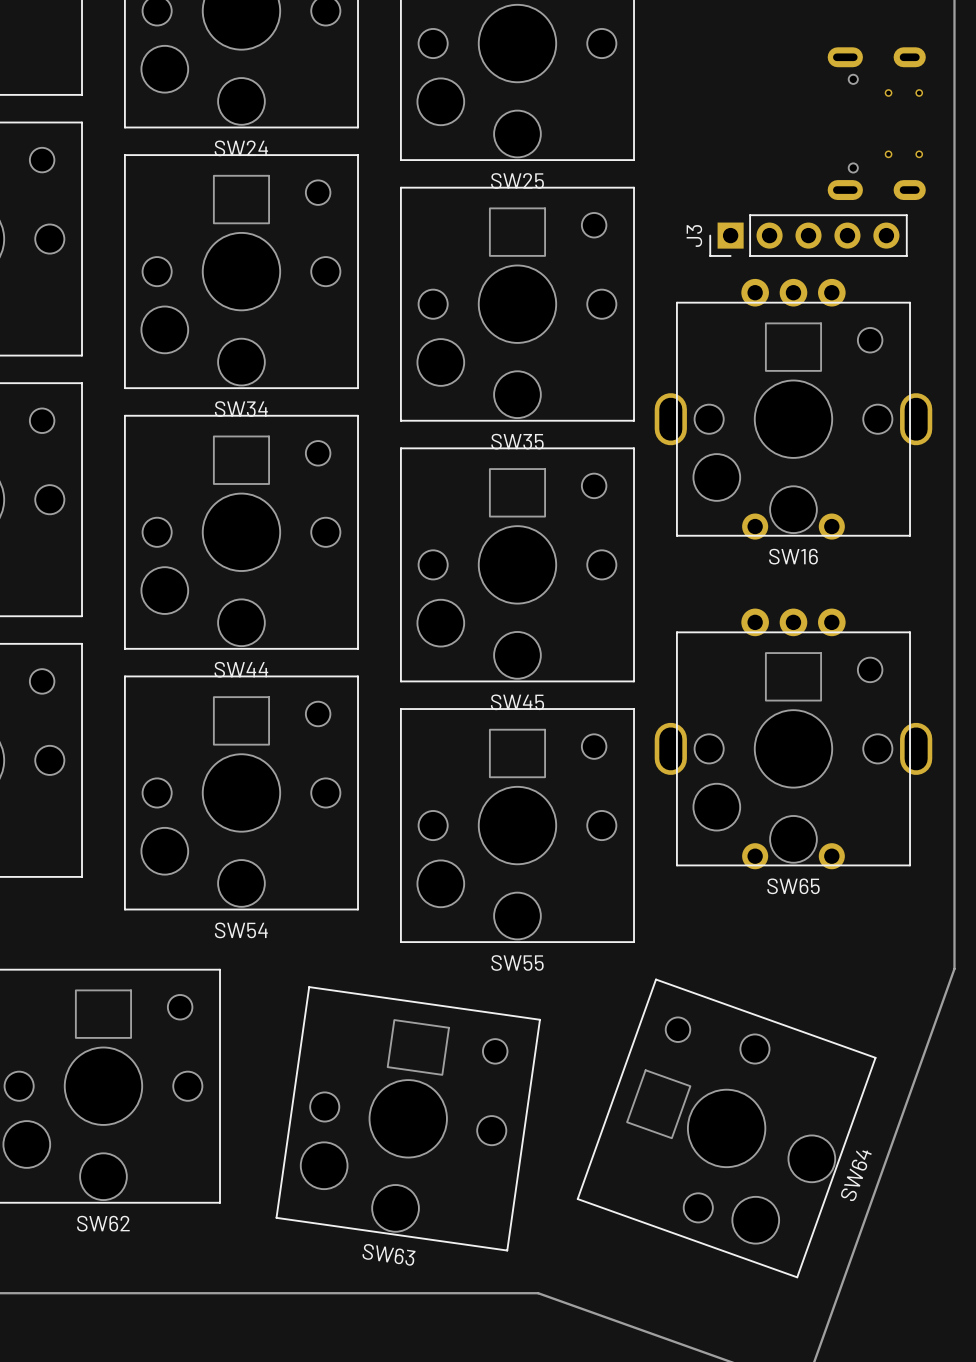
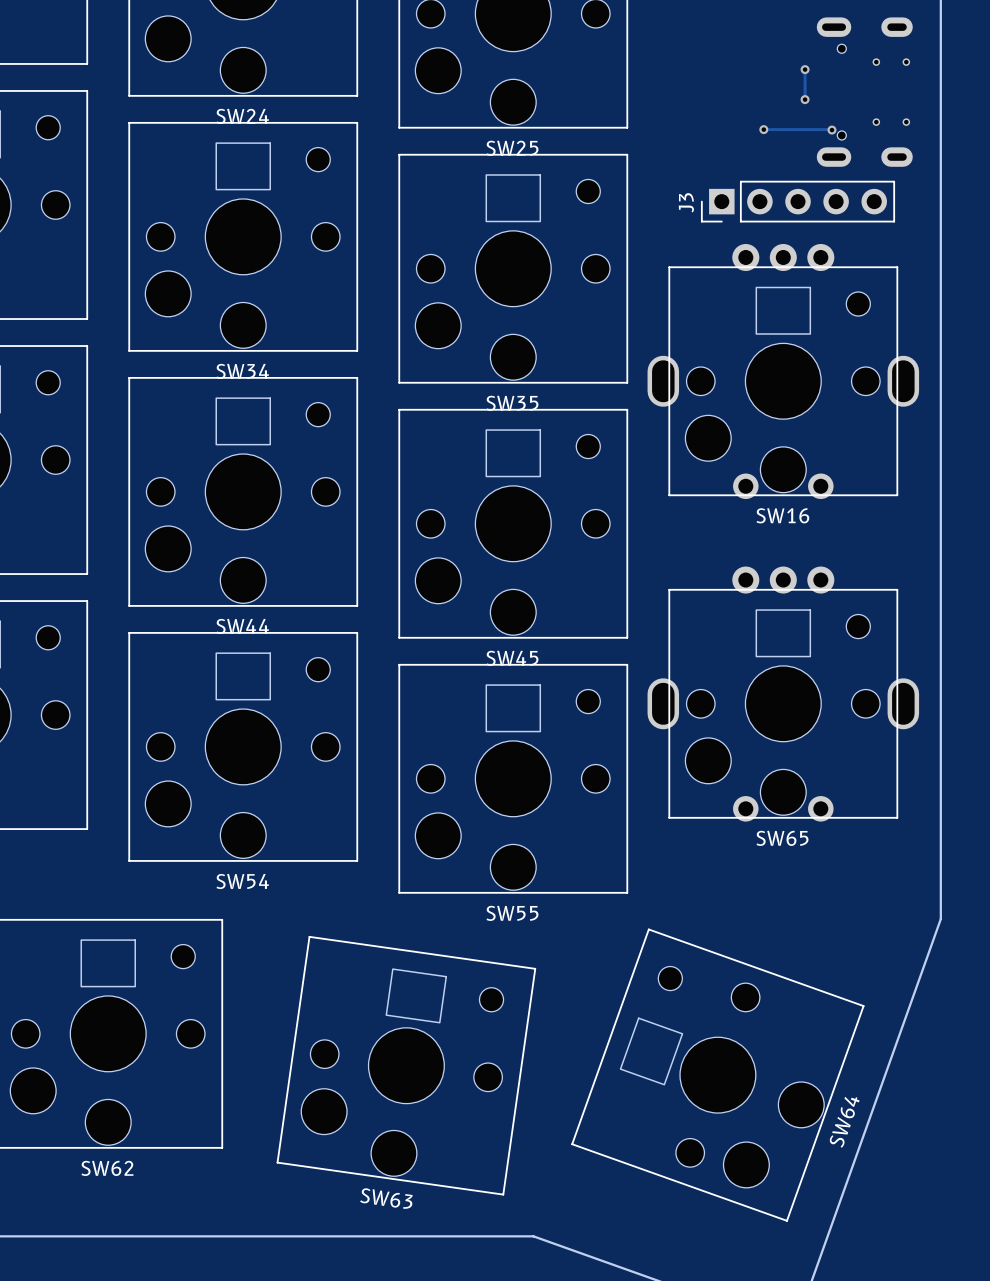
track: none -> (805, 69) (805, 99)
via: none -> (805, 69)
via: none -> (805, 99)
track: none -> (763, 129) (831, 130)
via: none -> (763, 129)
via: none -> (831, 130)

